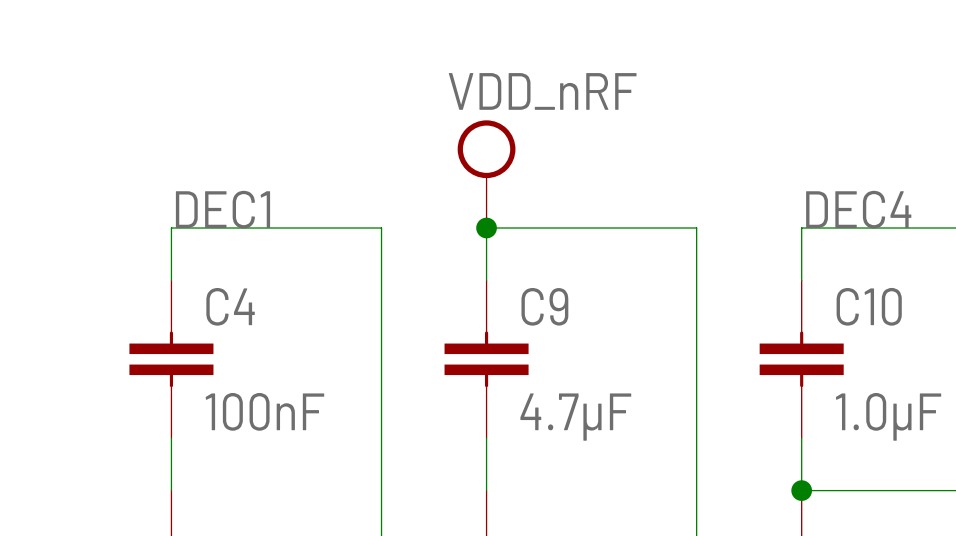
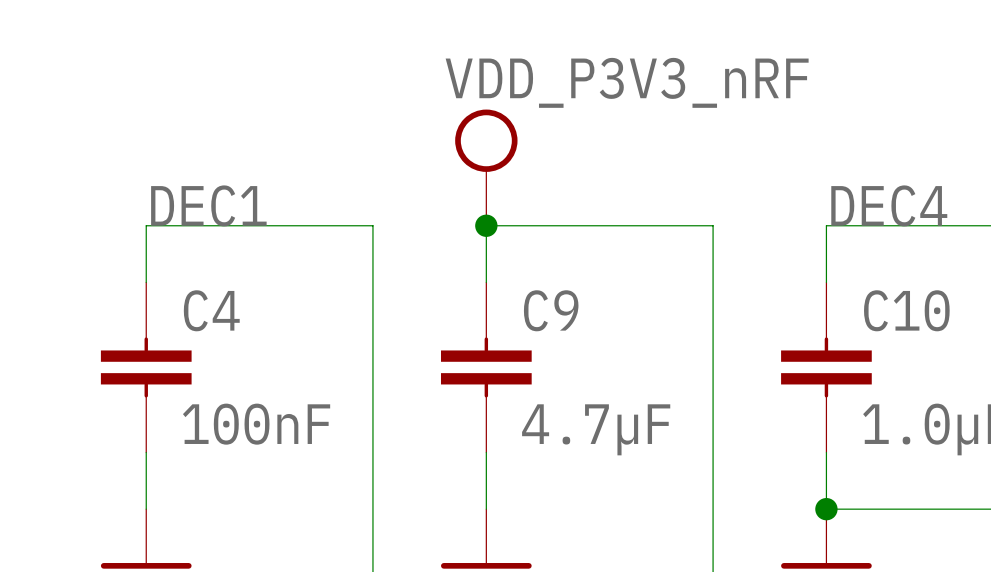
power symbol: VDD_nRF (486, 174) -> VDD_P3V3_nRF (486, 167)

